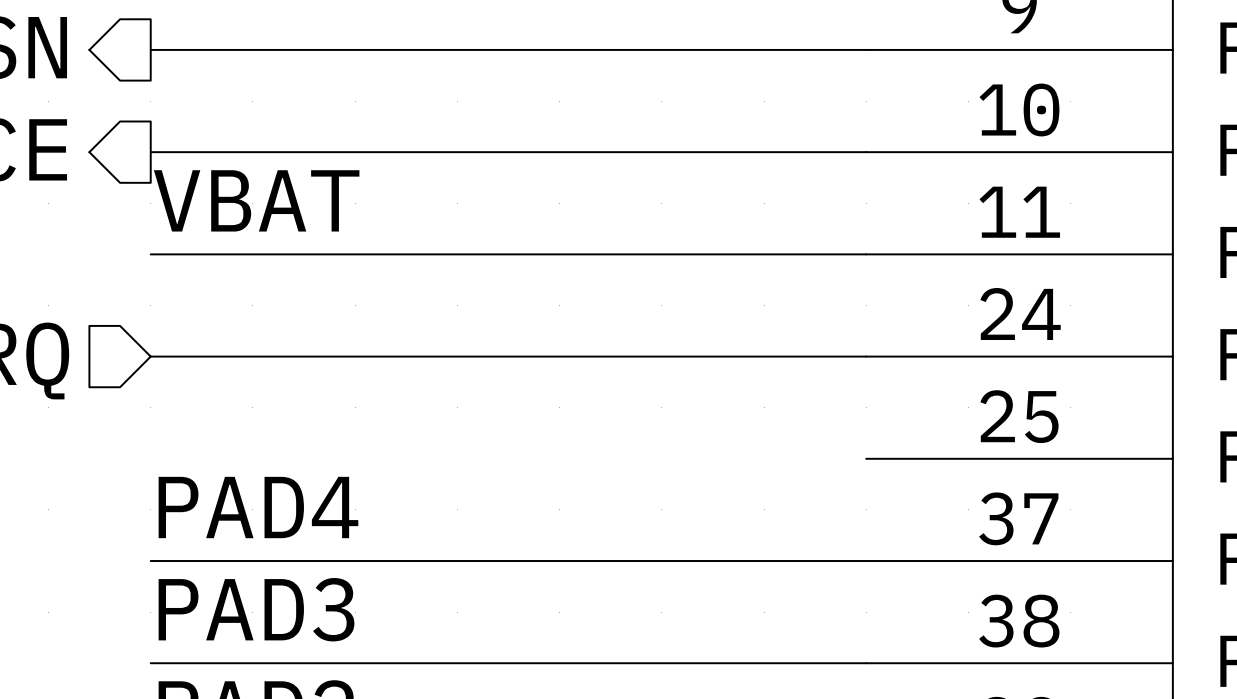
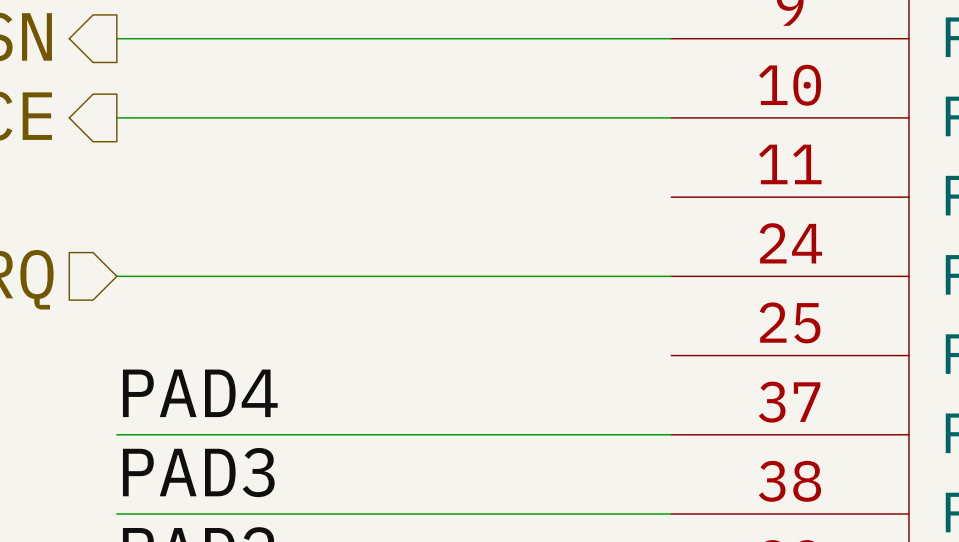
label: VBAT (256, 200) -> none
wire: (150, 254) (866, 254) -> none

